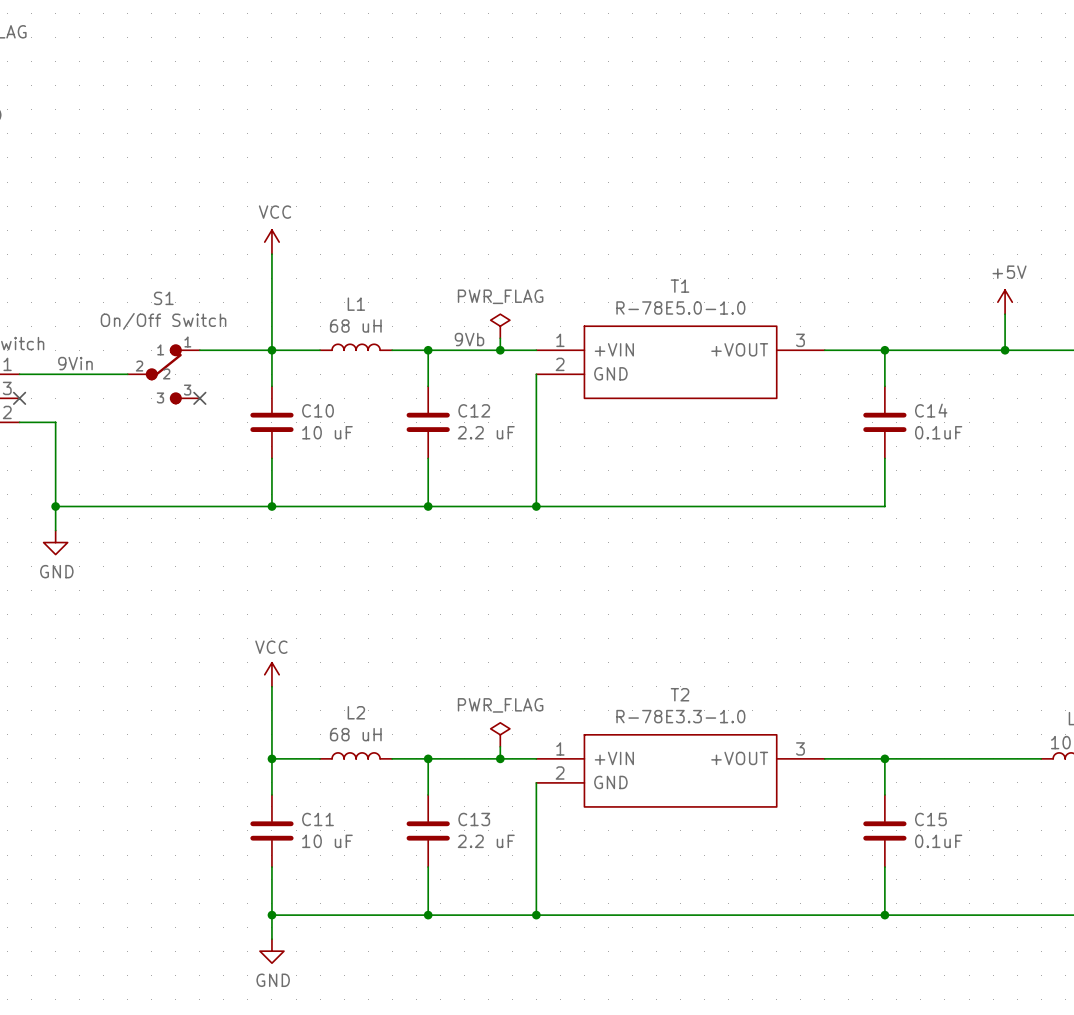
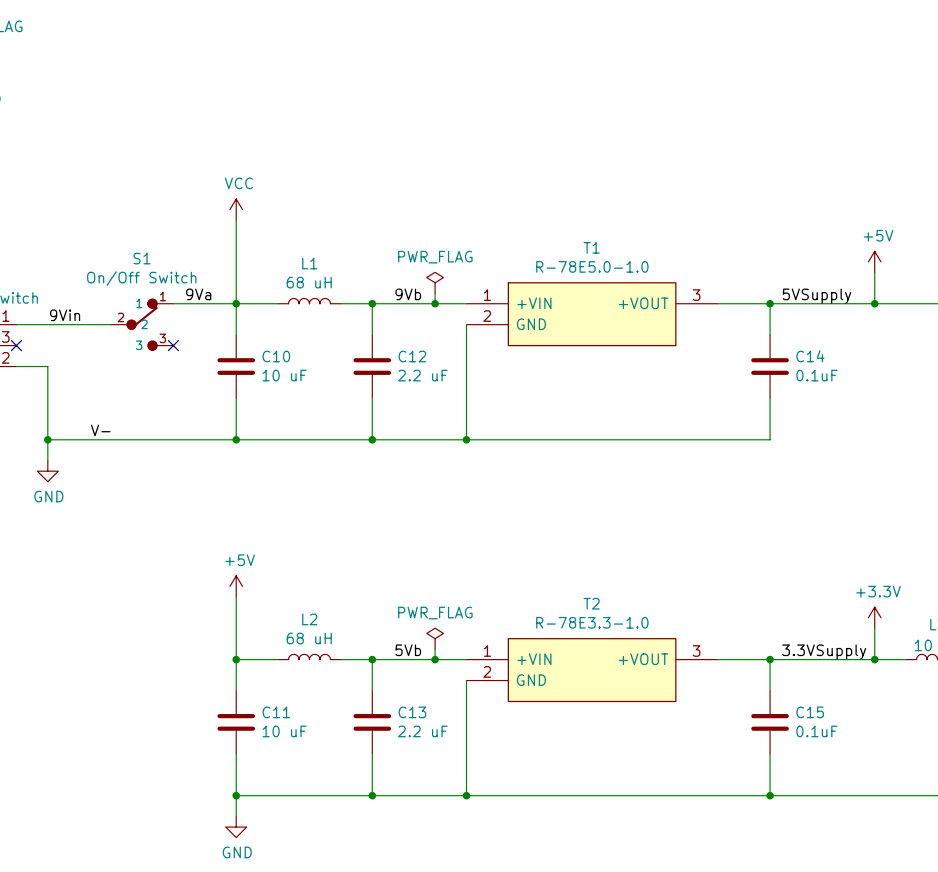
label: none -> 9Va (198, 294)
label: none -> 5VSupply (816, 296)
label: none -> V- (100, 430)
power symbol: VCC (271, 674) -> +5V (236, 586)
power symbol: none -> +3.3V (874, 617)
wire: none -> (874, 628) (874, 659)
label: none -> 5Vb (408, 650)
label: none -> 3.3VSupply (824, 652)
junction: none -> (874, 659)

